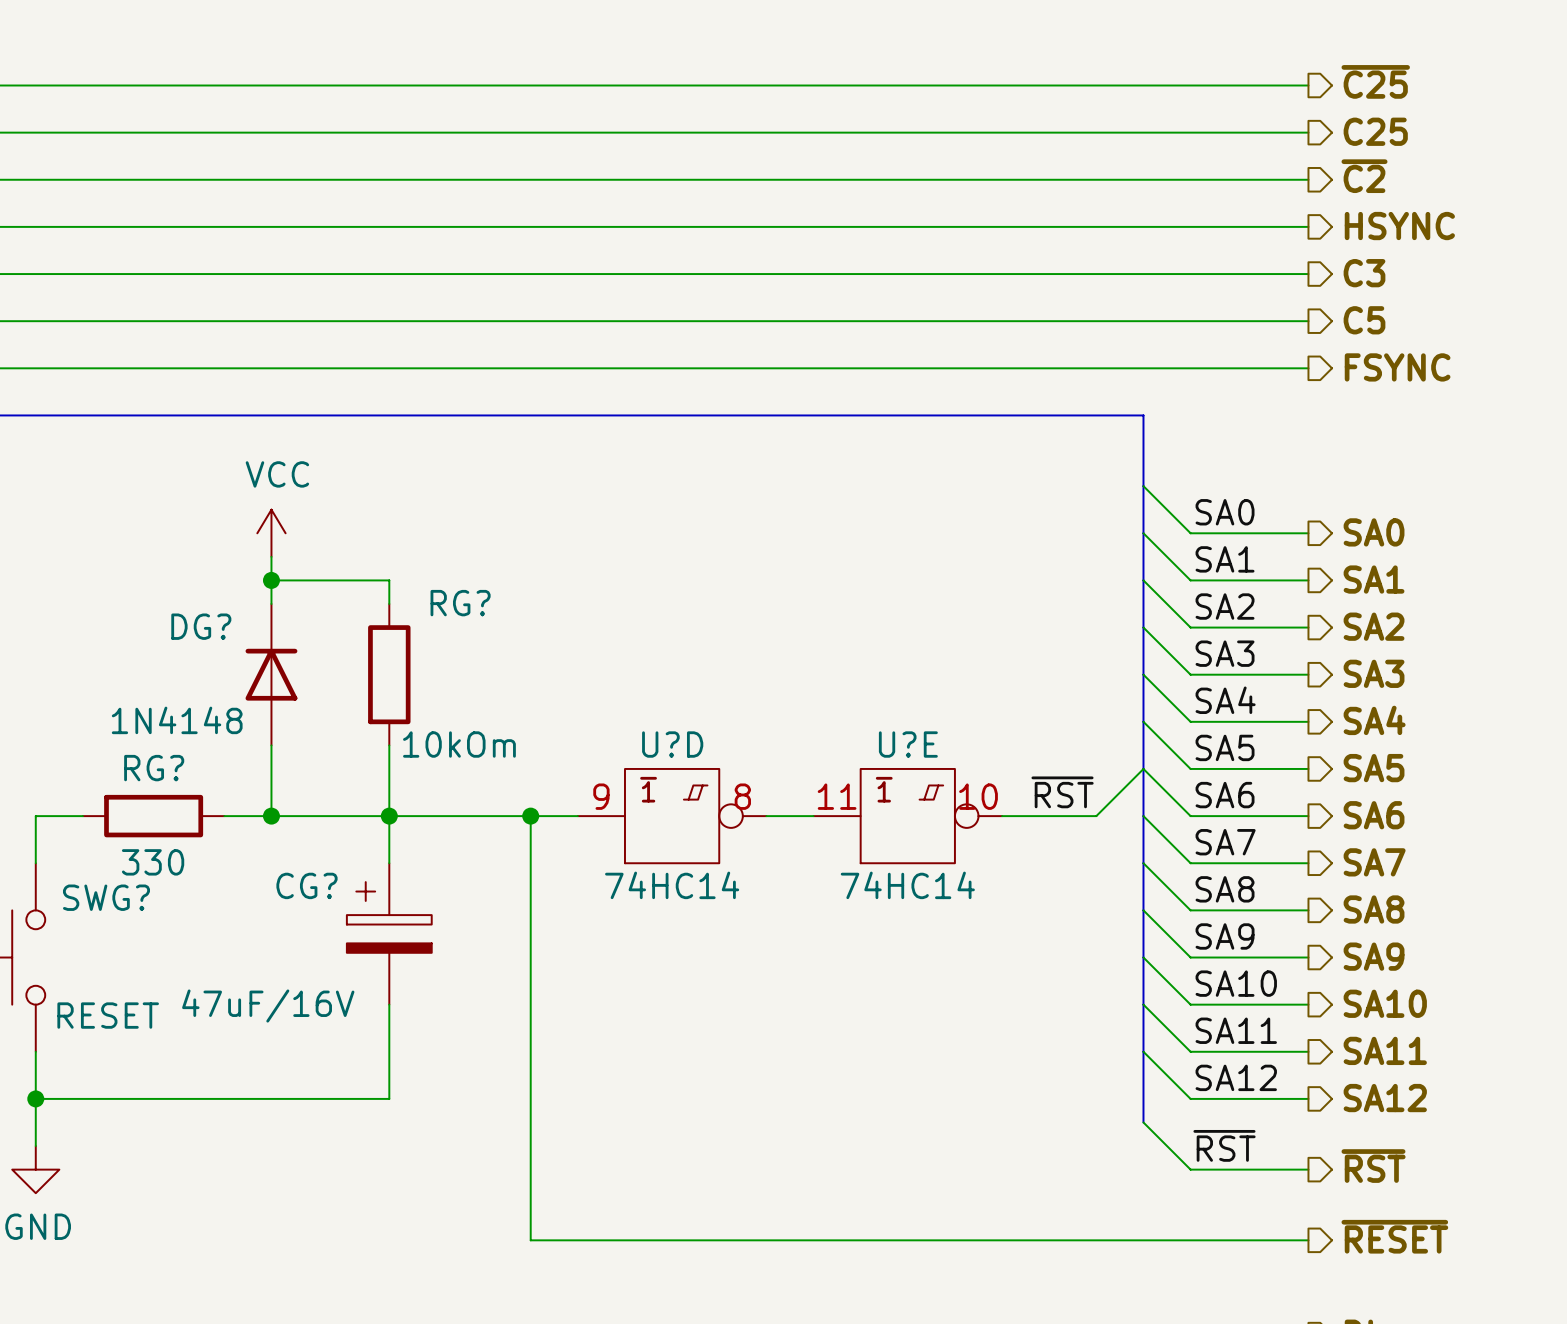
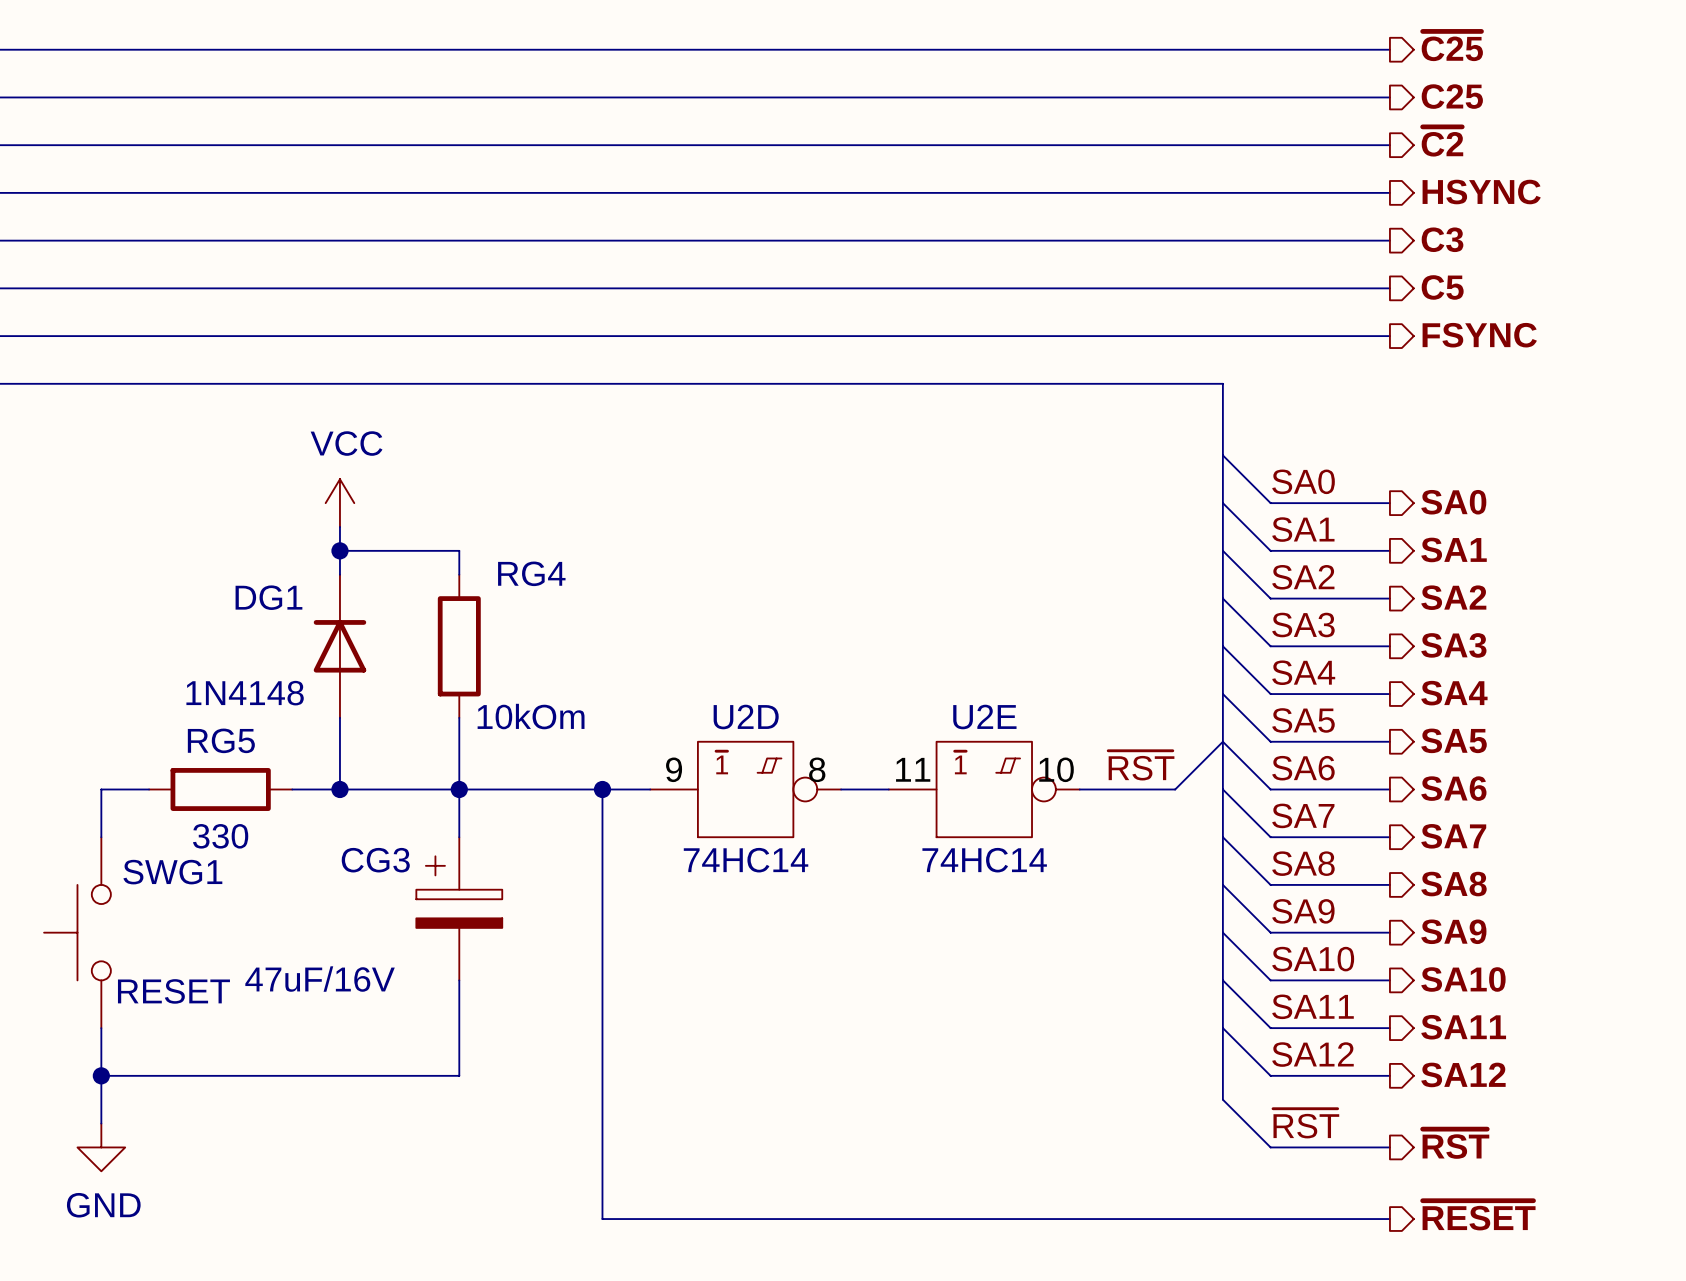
RG? name: RG? (460, 603) -> RG4 (531, 573)
DG? name: DG? (201, 626) -> DG1 (268, 597)
U?D name: U?D (672, 744) -> U2D (746, 717)
U?E name: U?E (908, 744) -> U2E (984, 717)
RG? name: RG? (154, 768) -> RG5 (221, 740)
CG? name: CG? (306, 885) -> CG3 (375, 860)
SWG? name: SWG? (106, 897) -> SWG1 (172, 872)

